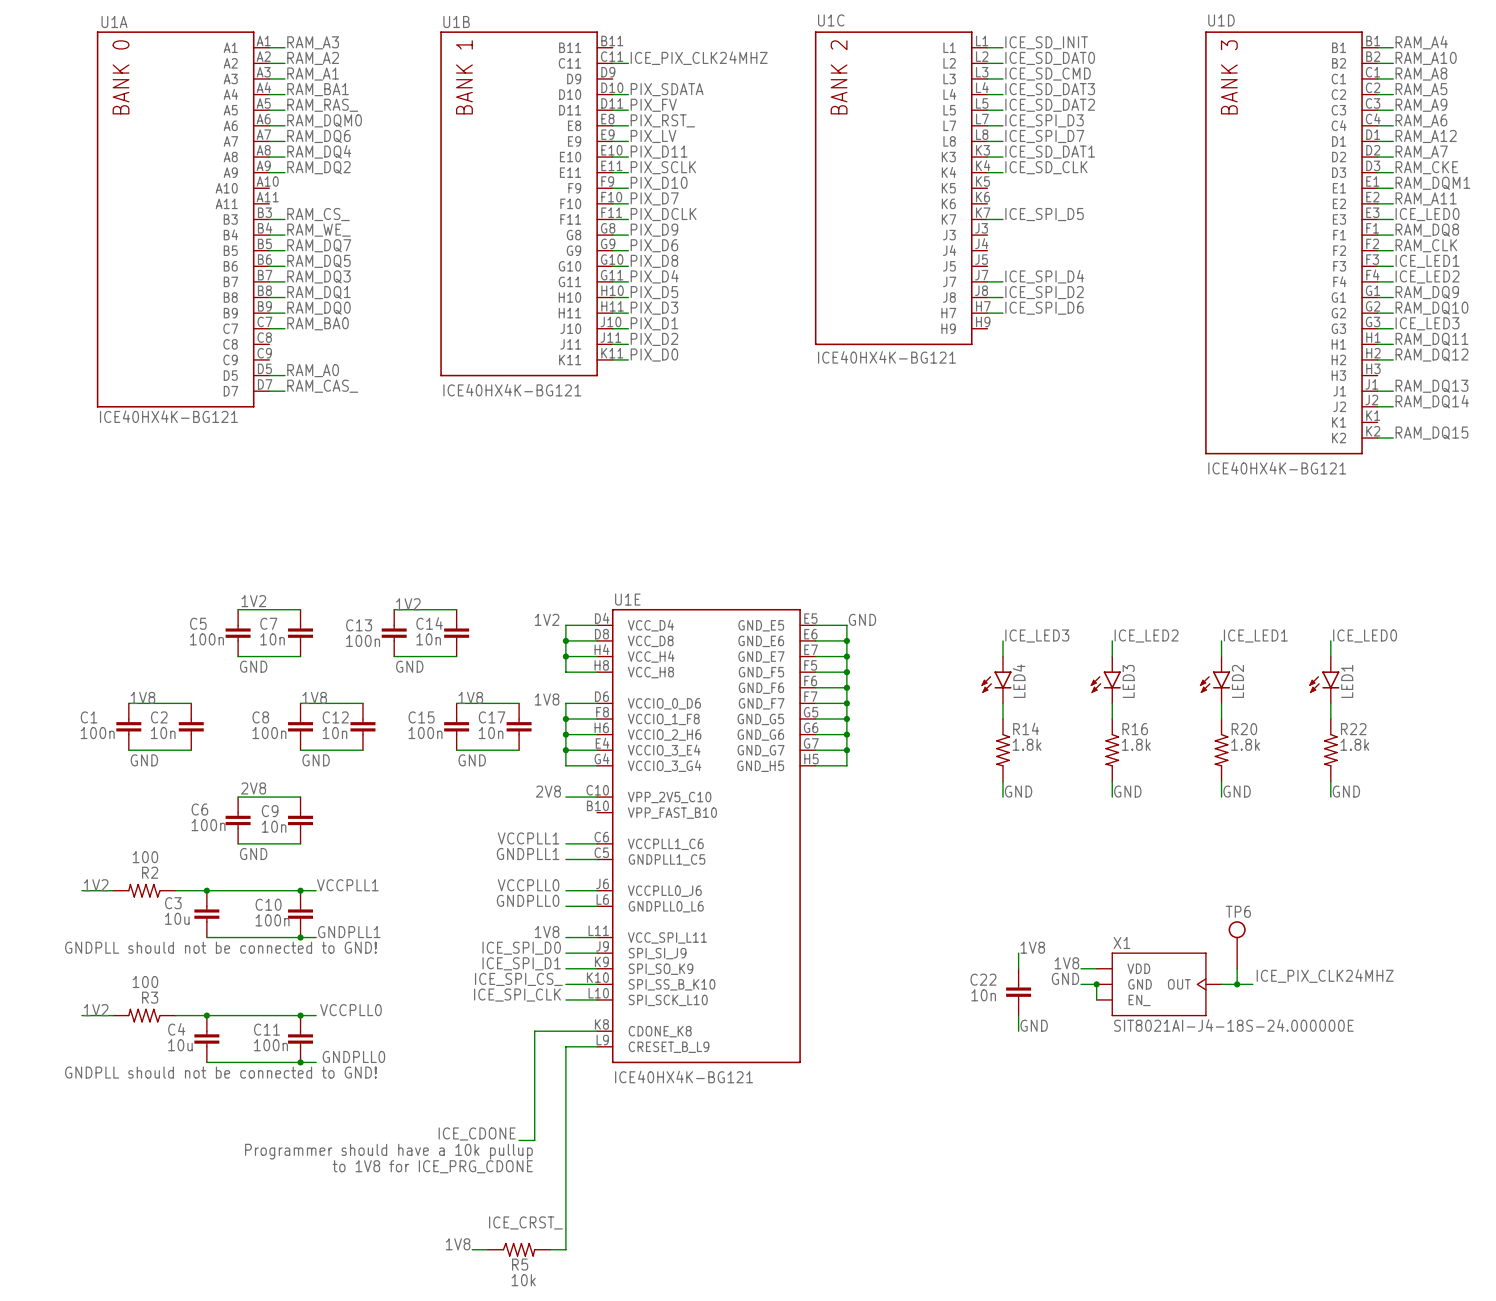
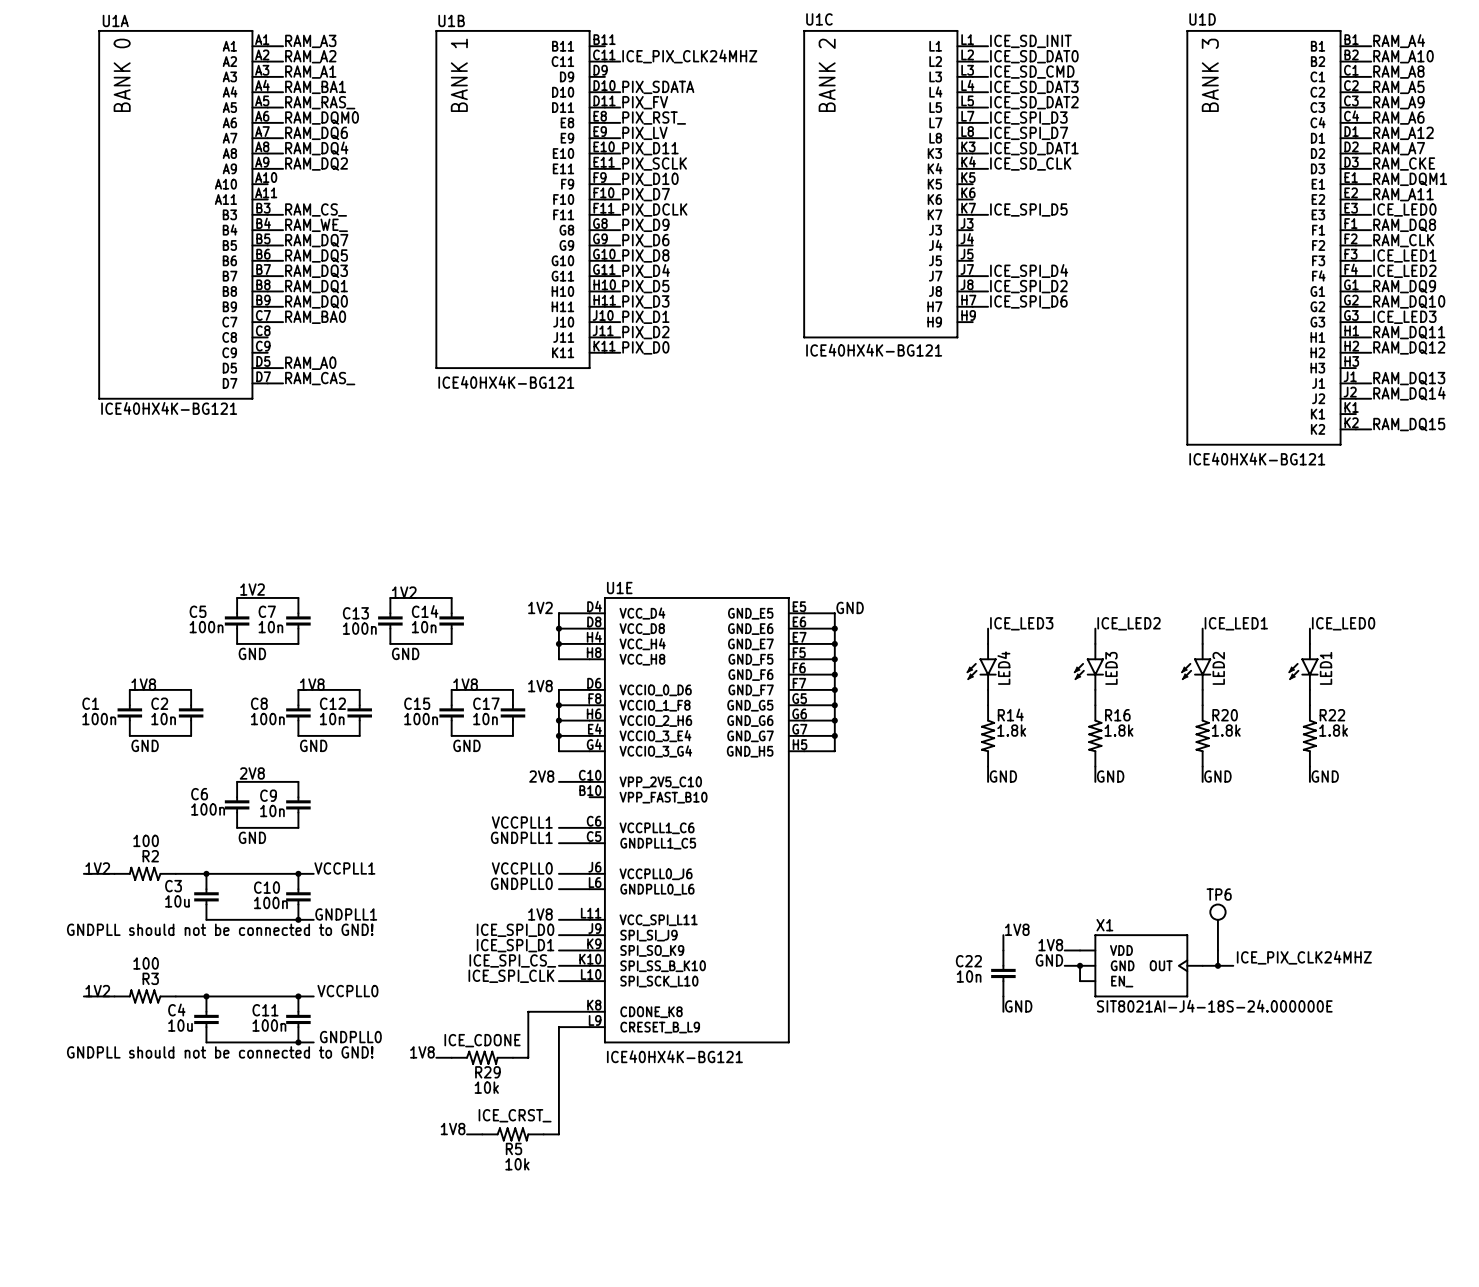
label: none -> 1V8 (422, 1052)
wire: none -> (436, 1057) (451, 1057)
R29: none -> 10k (482, 1057)
wire: (534, 1078) (534, 1140) (519, 1140) -> (528, 1057) (512, 1057)
label position: ICE_CDONE (477, 1133) -> ICE_CDONE (482, 1040)
label: none -> 1V8 (453, 1129)
text: Programmer should have a 10k pullup (388, 1151) -> none
wire: (565, 1156) (565, 1249) (550, 1249) -> (558, 1134) (543, 1134)
text: to 1V8 for ICE_PRG_CDONE (432, 1166) -> none
label position: ICE_CRST_ (525, 1222) -> ICE_CRST_ (515, 1115)
label: 1V8 (458, 1244) -> none
wire: (472, 1249) (487, 1249) -> (466, 1134) (482, 1134)
R5 position: (519, 1249) -> (512, 1134)

